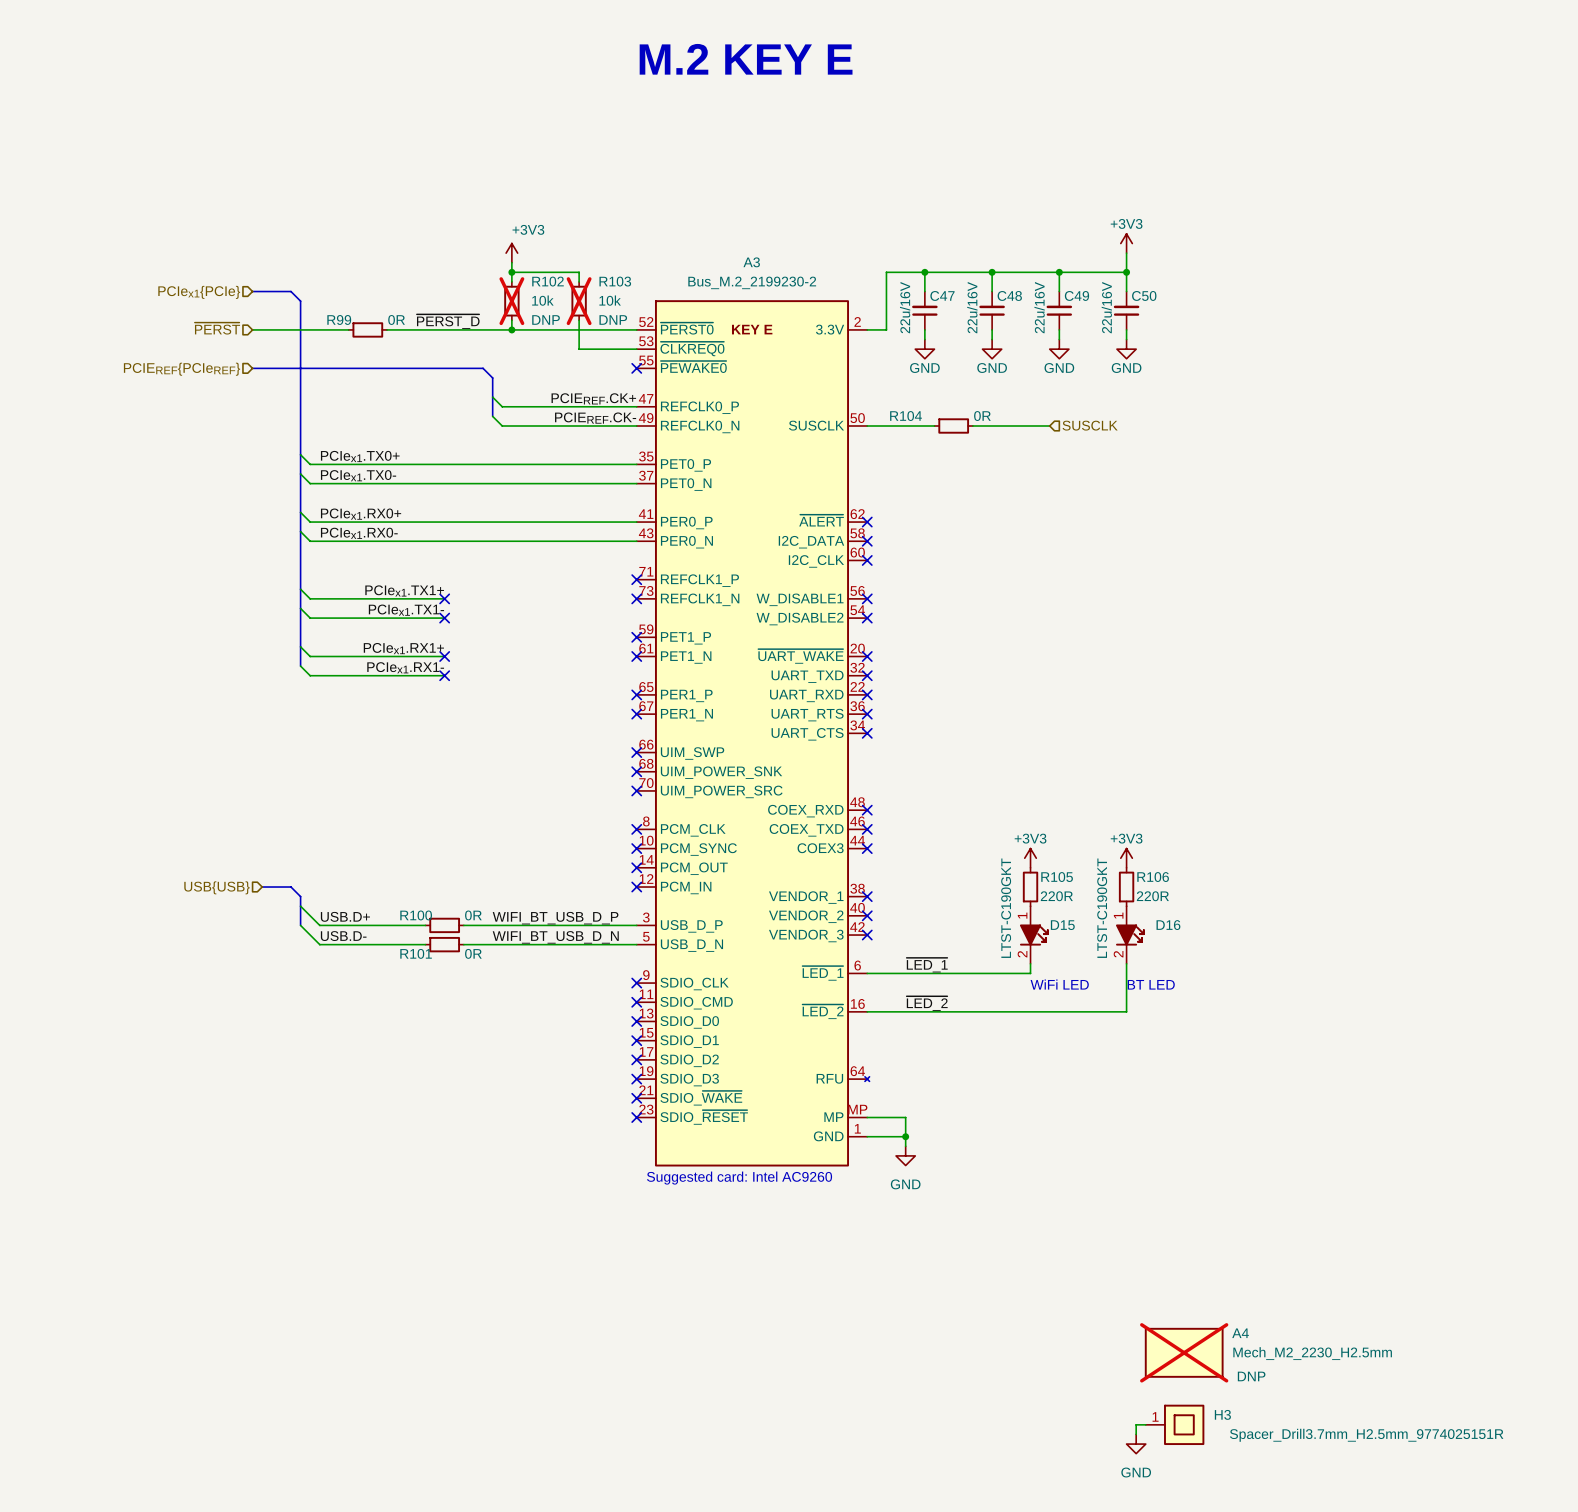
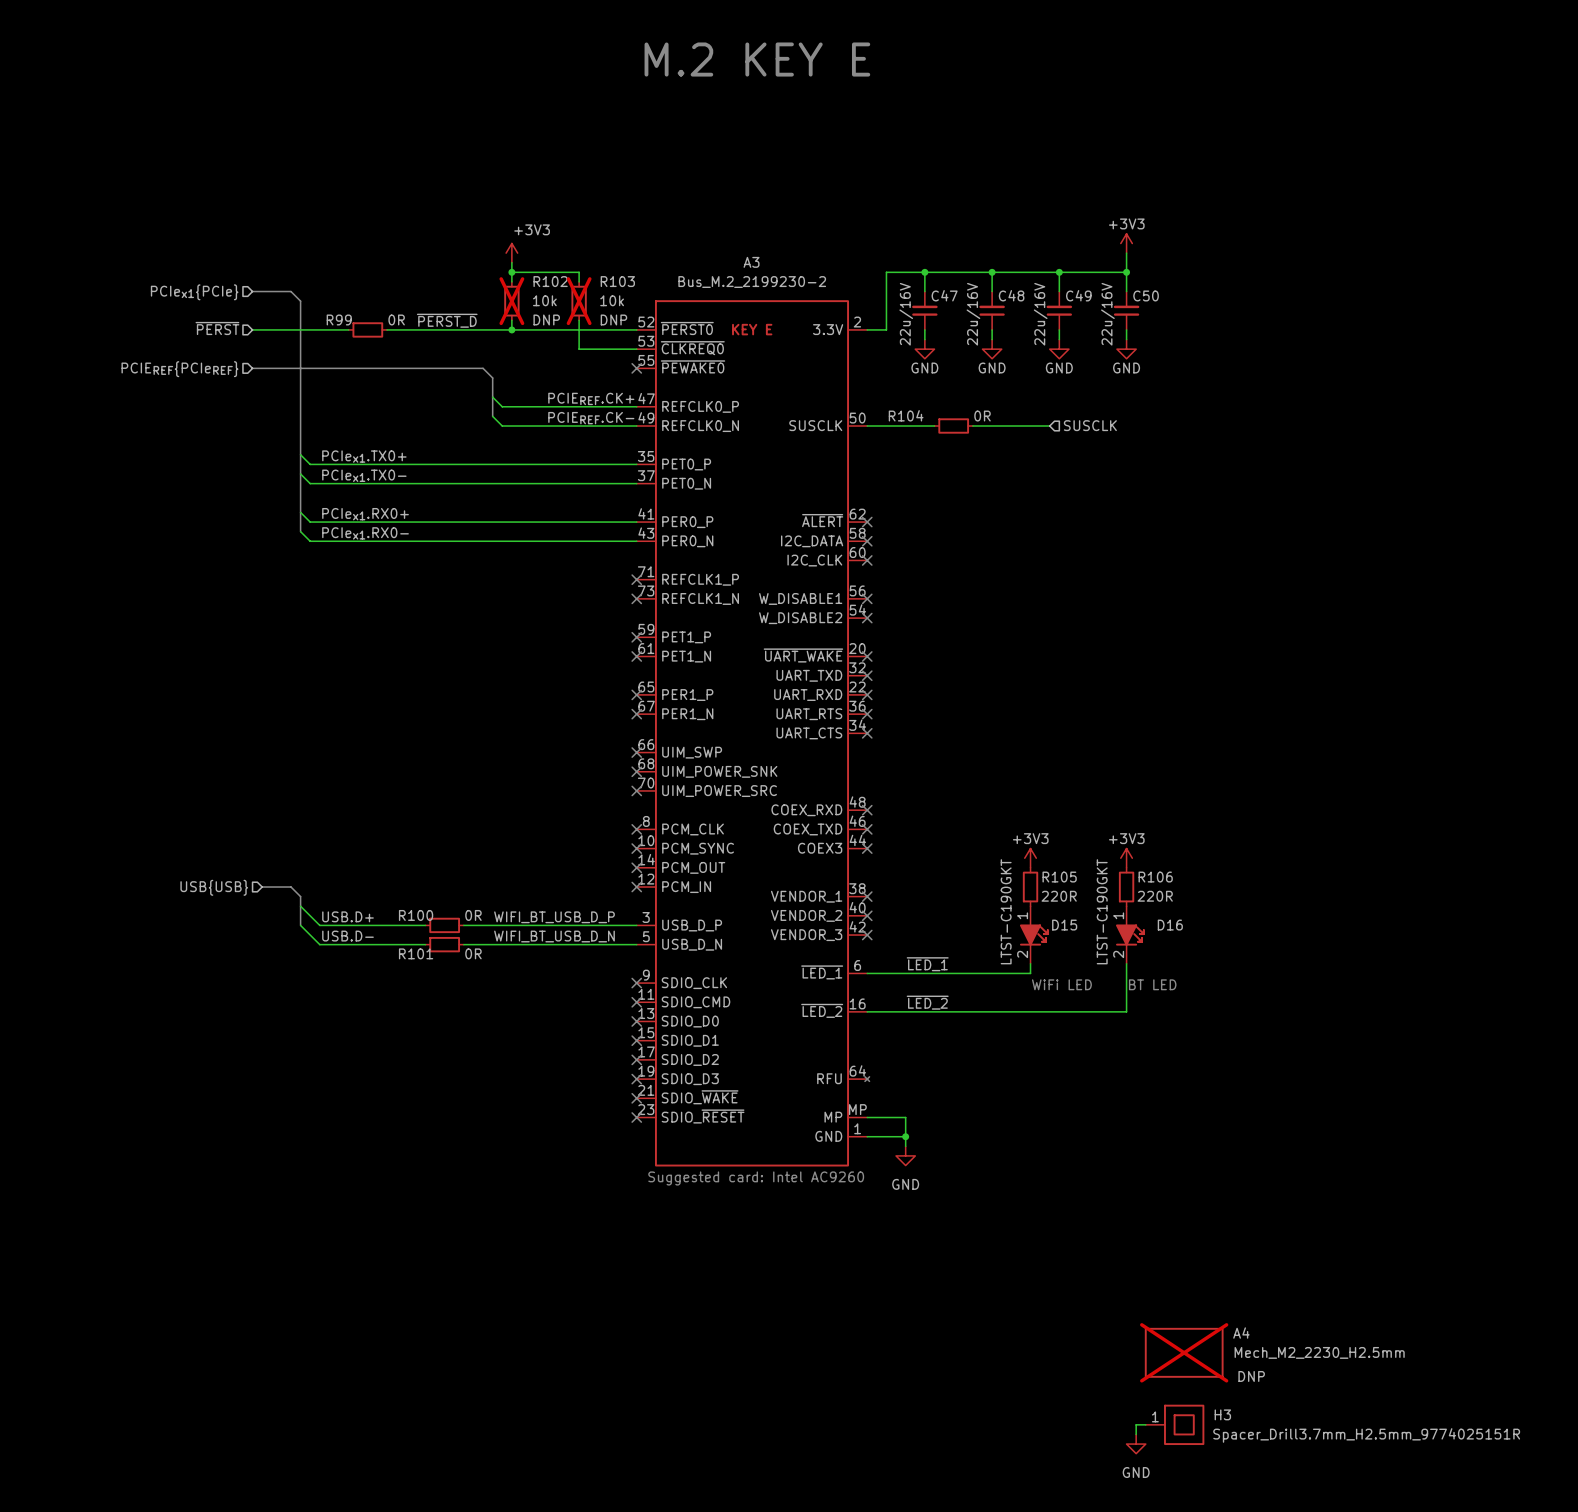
bus: (300, 531) (300, 666) -> none
wire: (300, 589) (310, 598) (444, 598) -> none
label: PCIex1.TX1+ (404, 590) -> none
no-connect mark: (444, 598) -> none
wire: (300, 608) (310, 618) (444, 618) -> none
label: PCIex1.TX1- (406, 610) -> none
no-connect mark: (444, 618) -> none
wire: (300, 646) (310, 656) (444, 656) -> none
label: PCIex1.RX1+ (403, 648) -> none
no-connect mark: (444, 656) -> none
wire: (300, 666) (310, 675) (444, 675) -> none
label: PCIex1.RX1- (405, 667) -> none
no-connect mark: (444, 675) -> none

